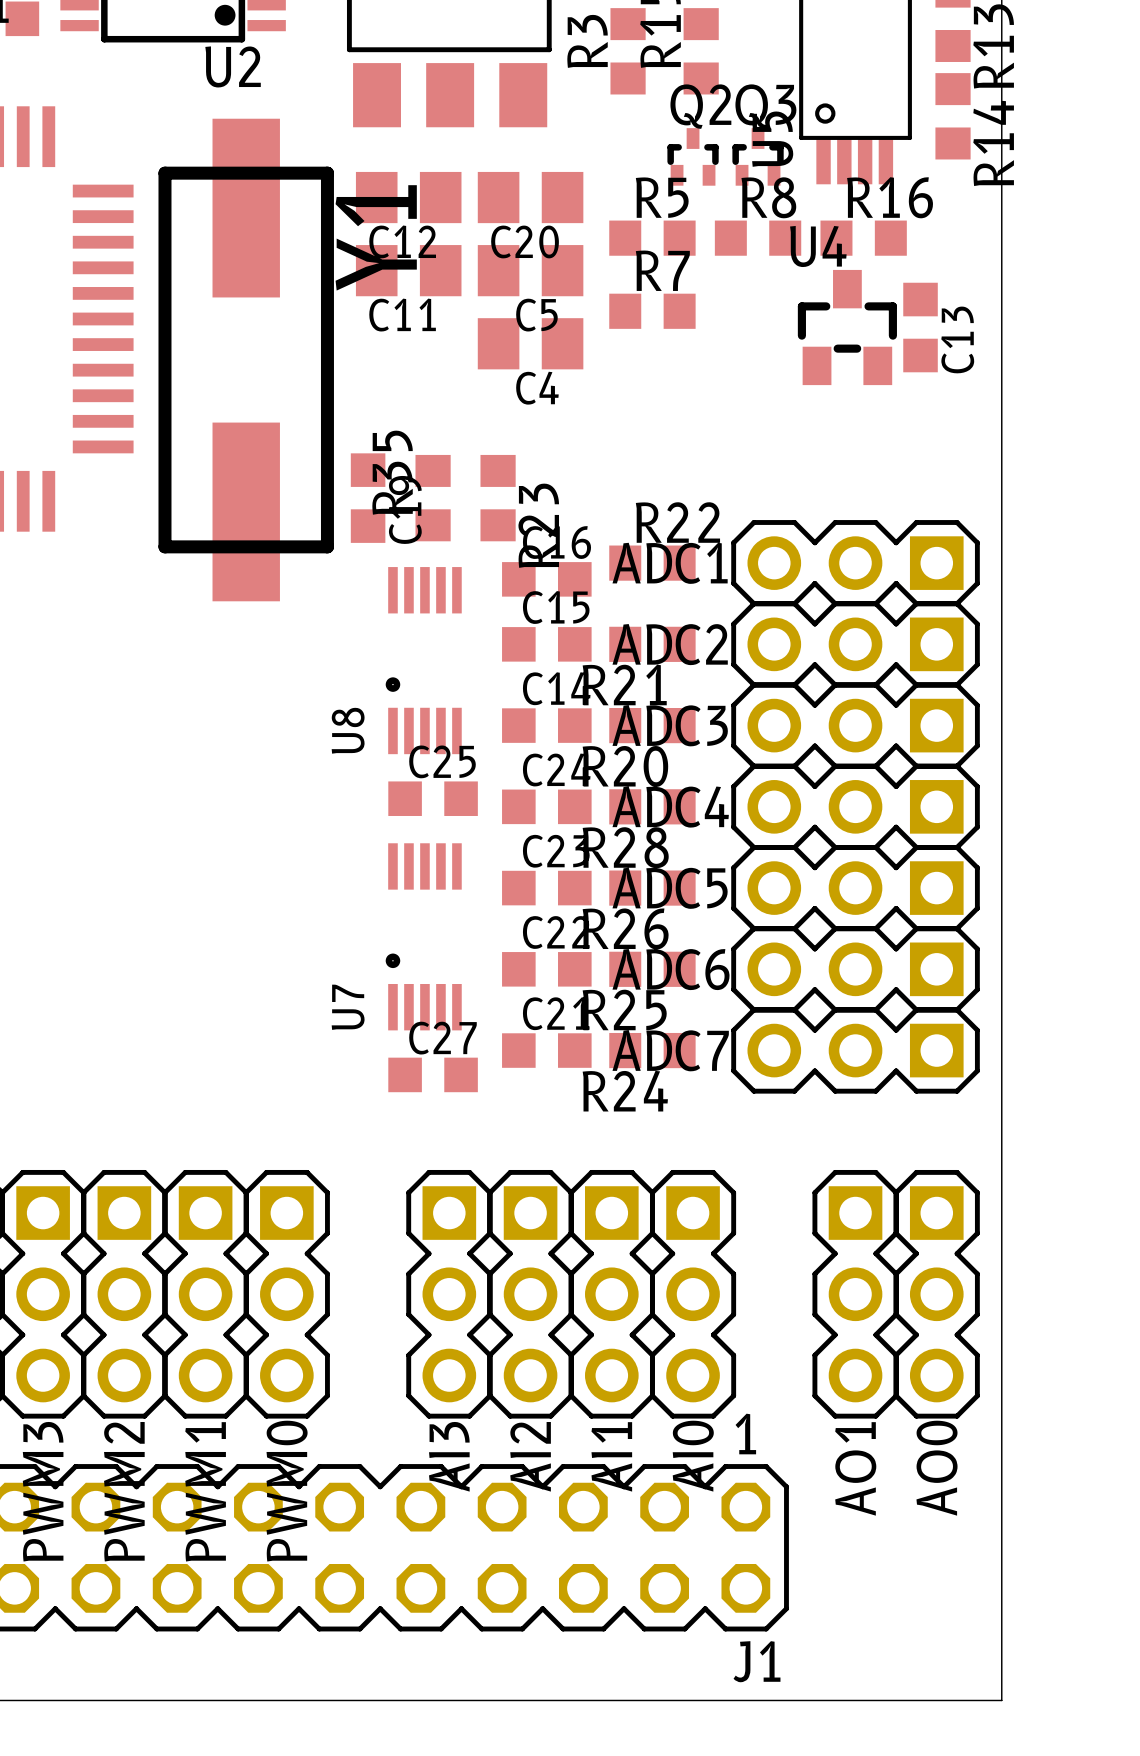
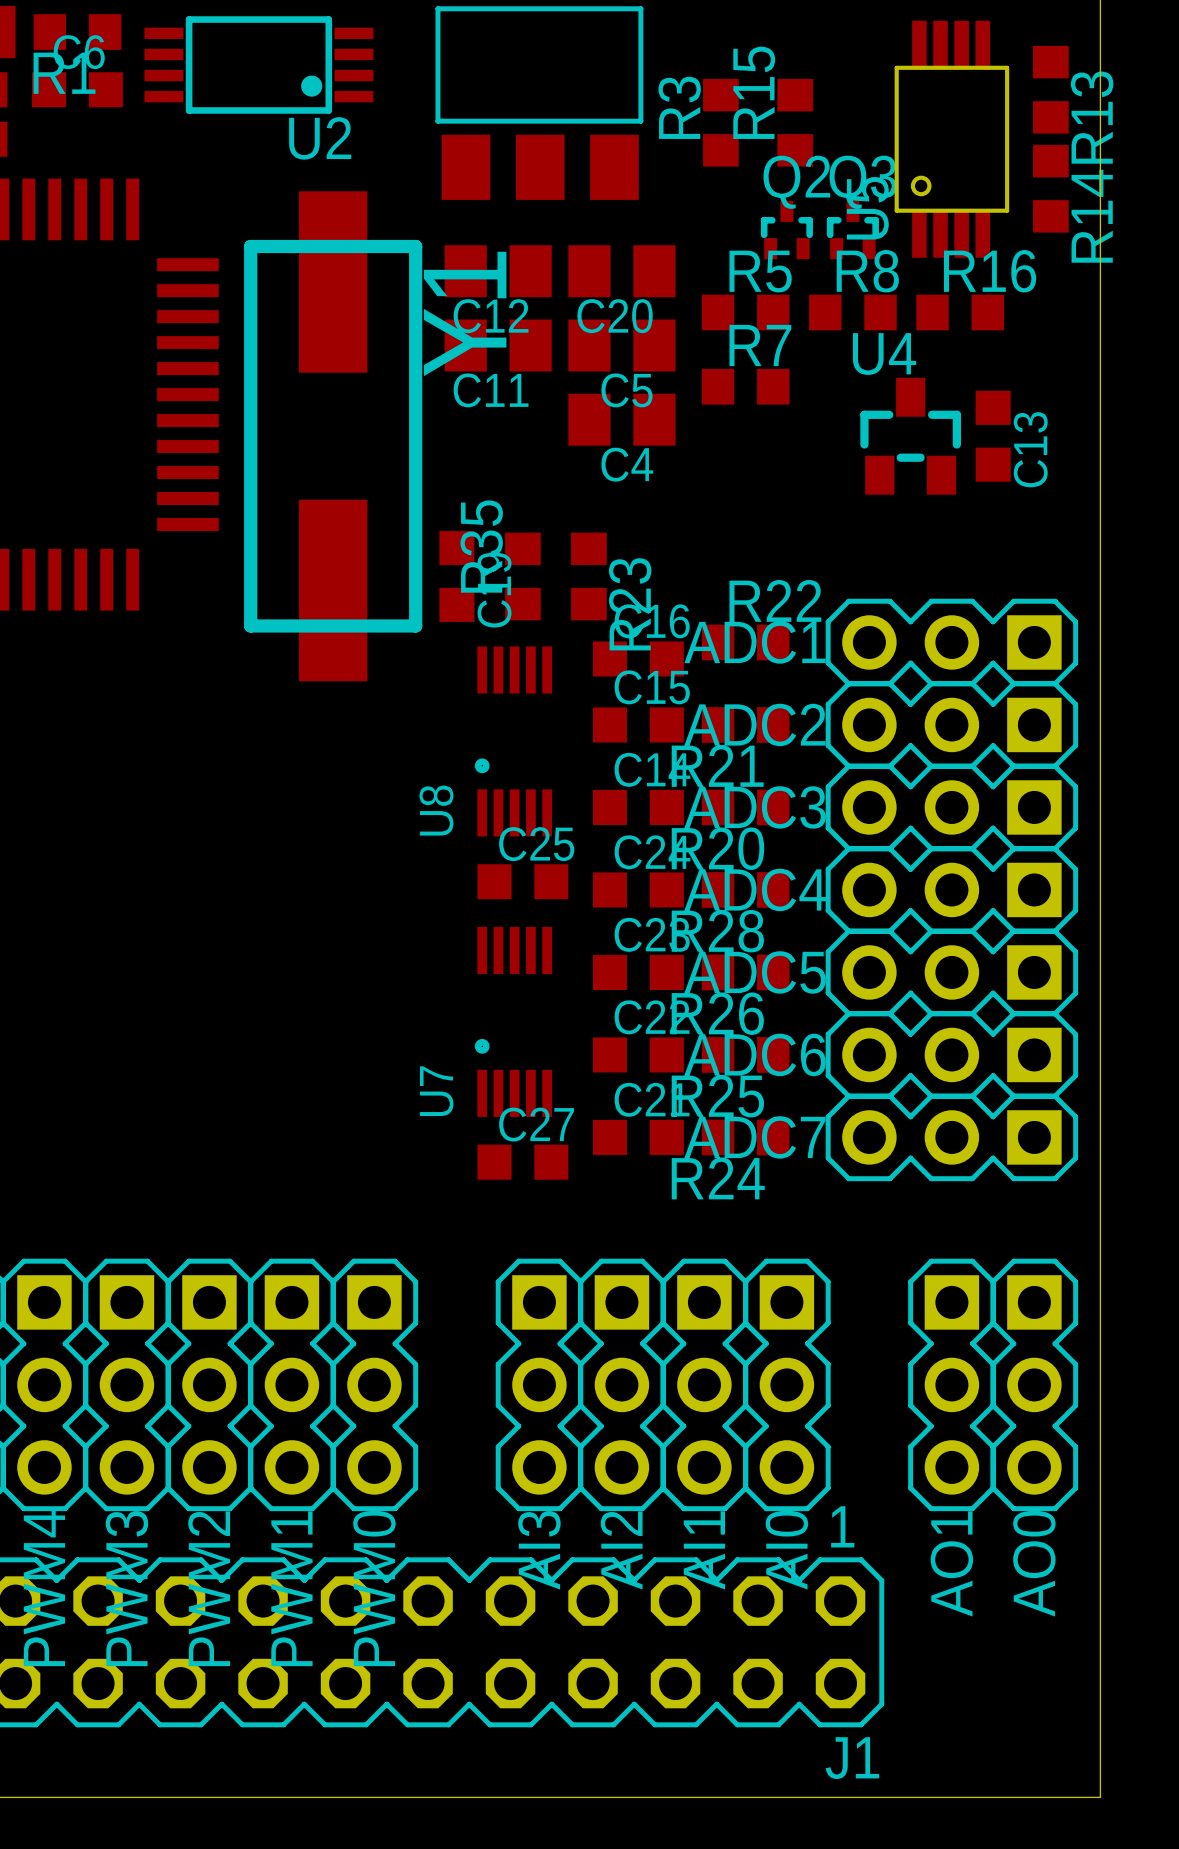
U4 position: (847, 327) -> (910, 436)
C13 position: (920, 327) -> (993, 436)

